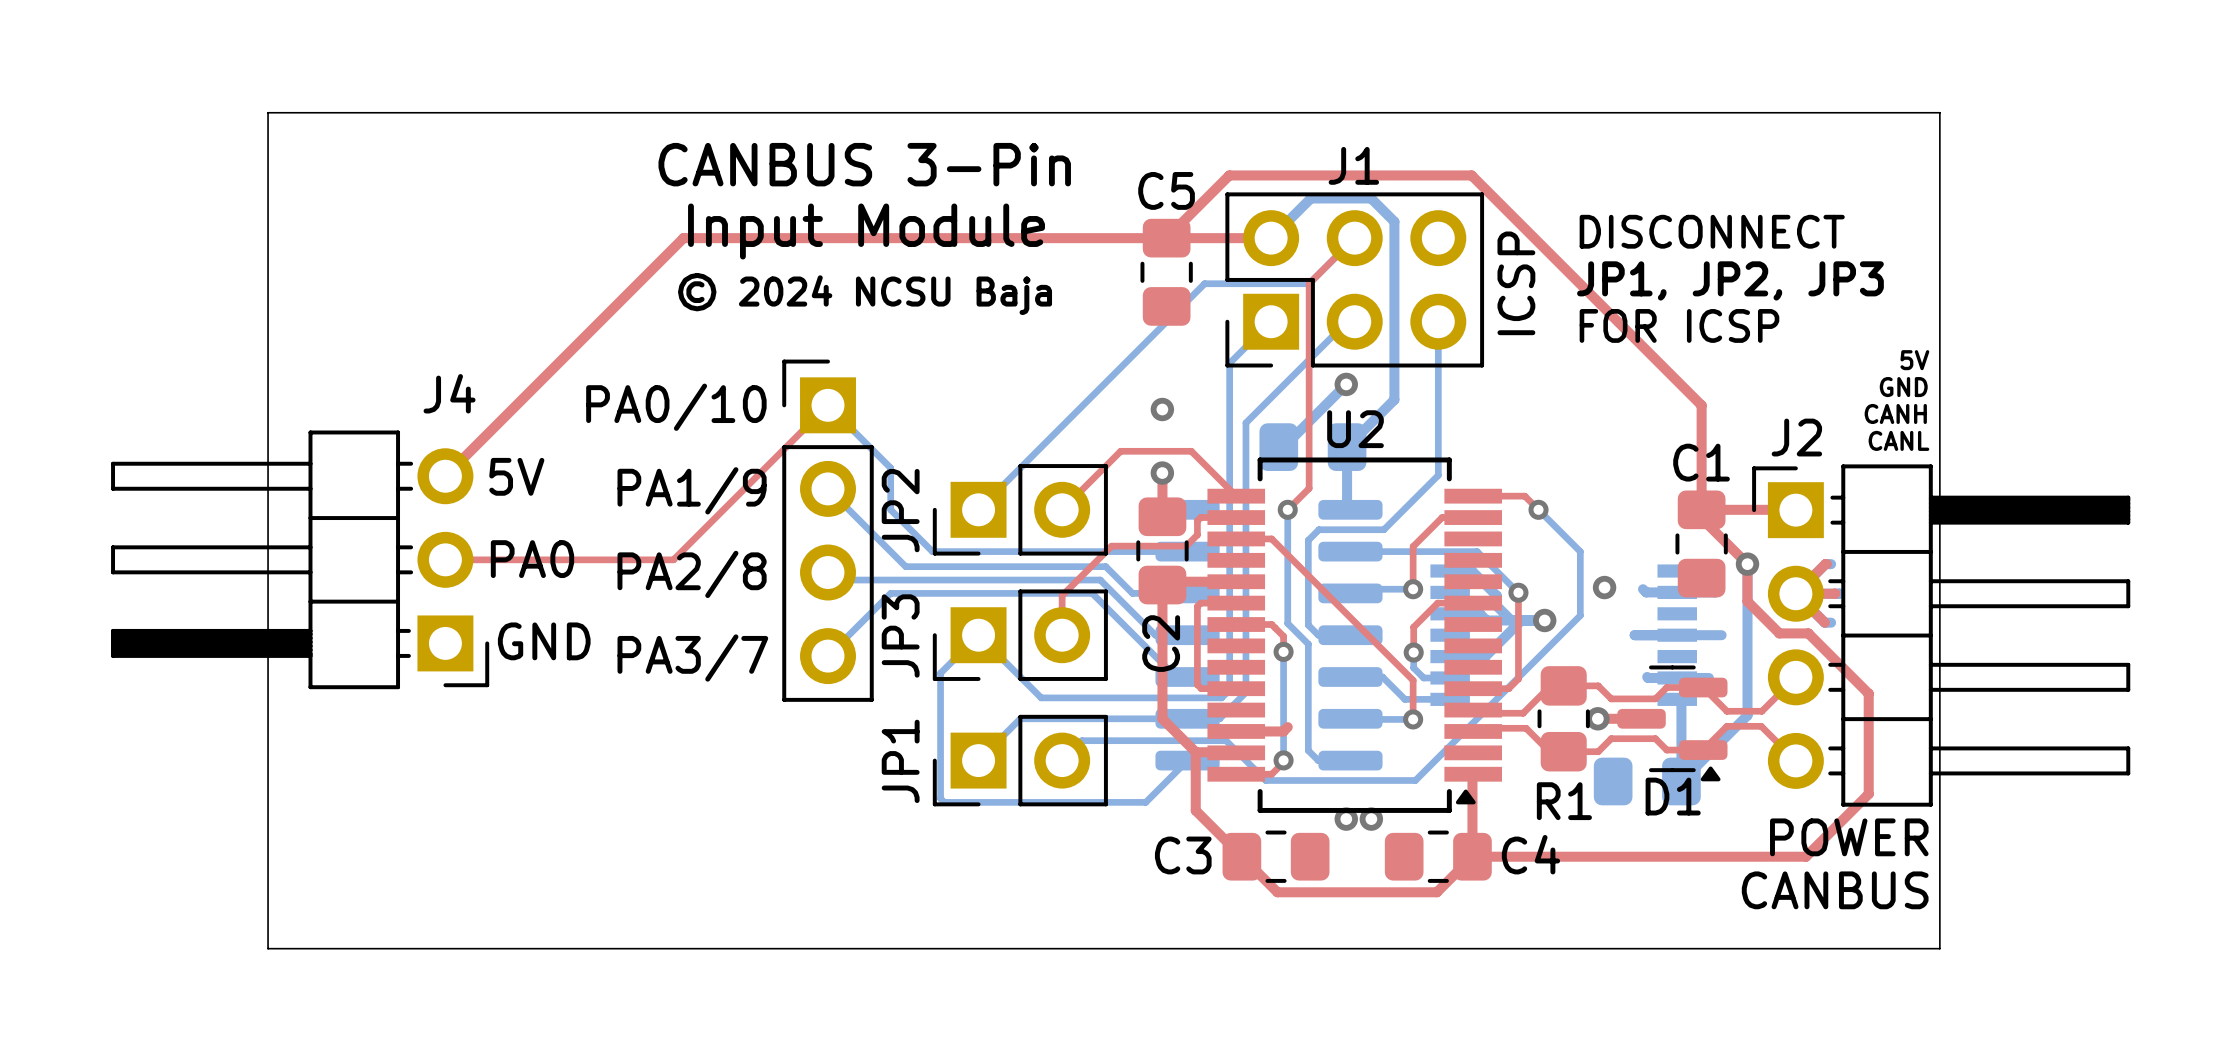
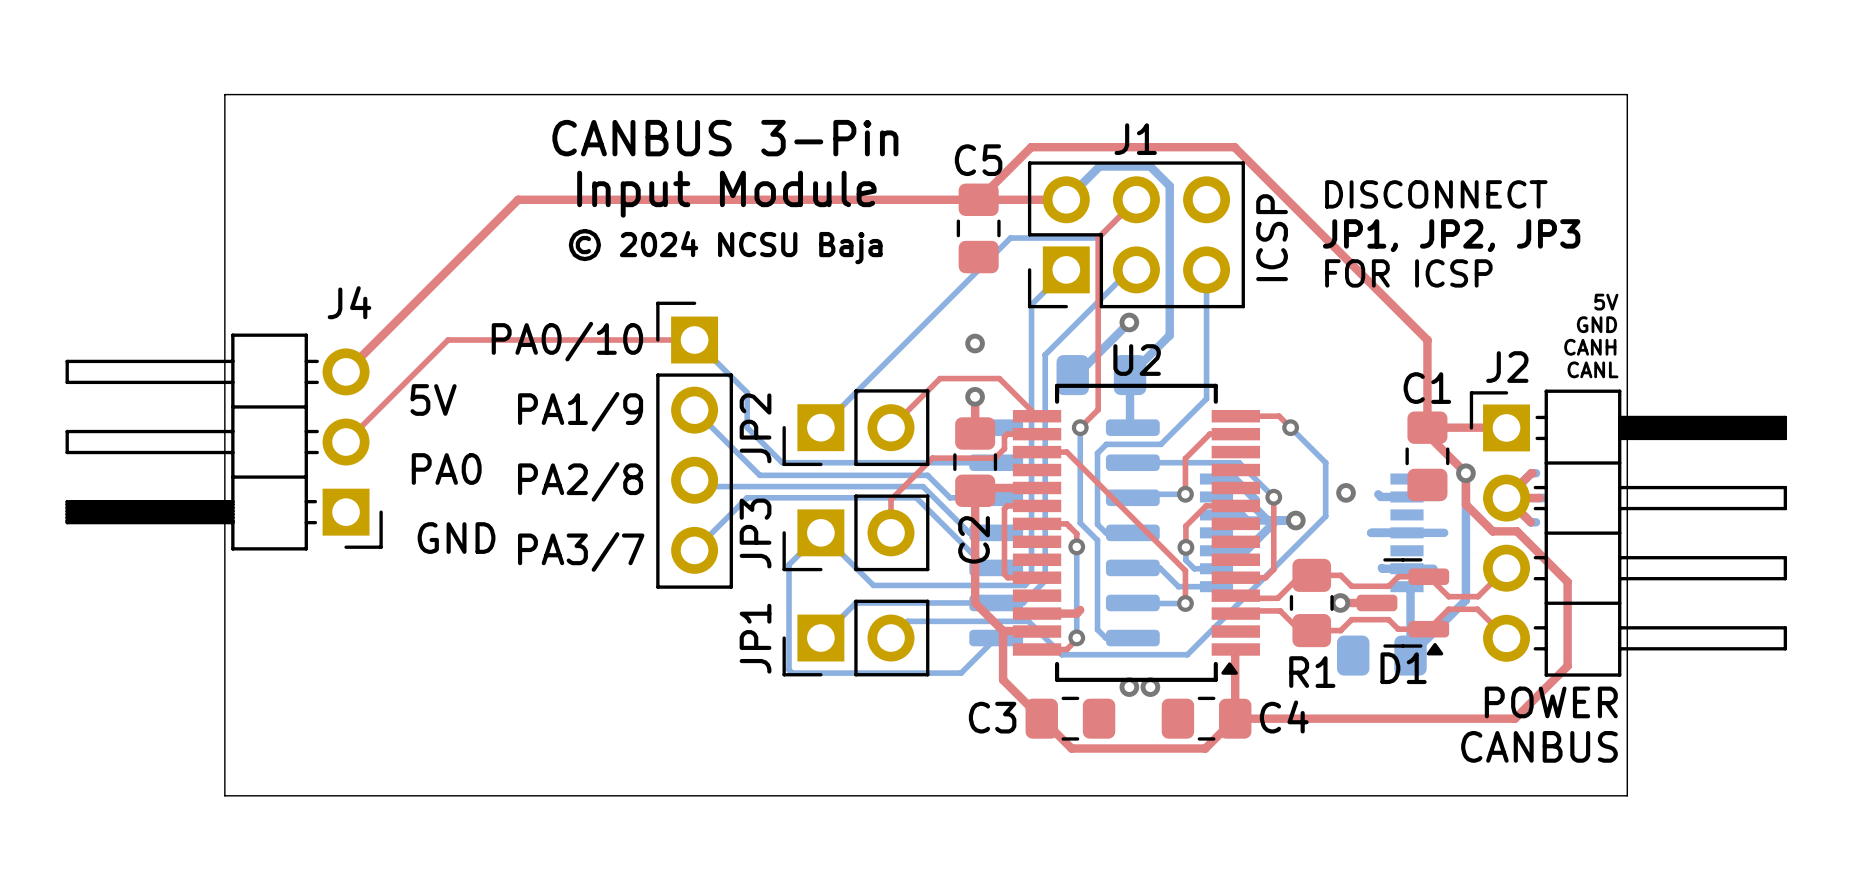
top track: (683, 238) (445, 476) -> (573, 199) (518, 199) (346, 371)
top track: (828, 405) (673, 559) (445, 559) -> (694, 340) (448, 340) (346, 442)
J4 position: (300, 559) -> (224, 442)

